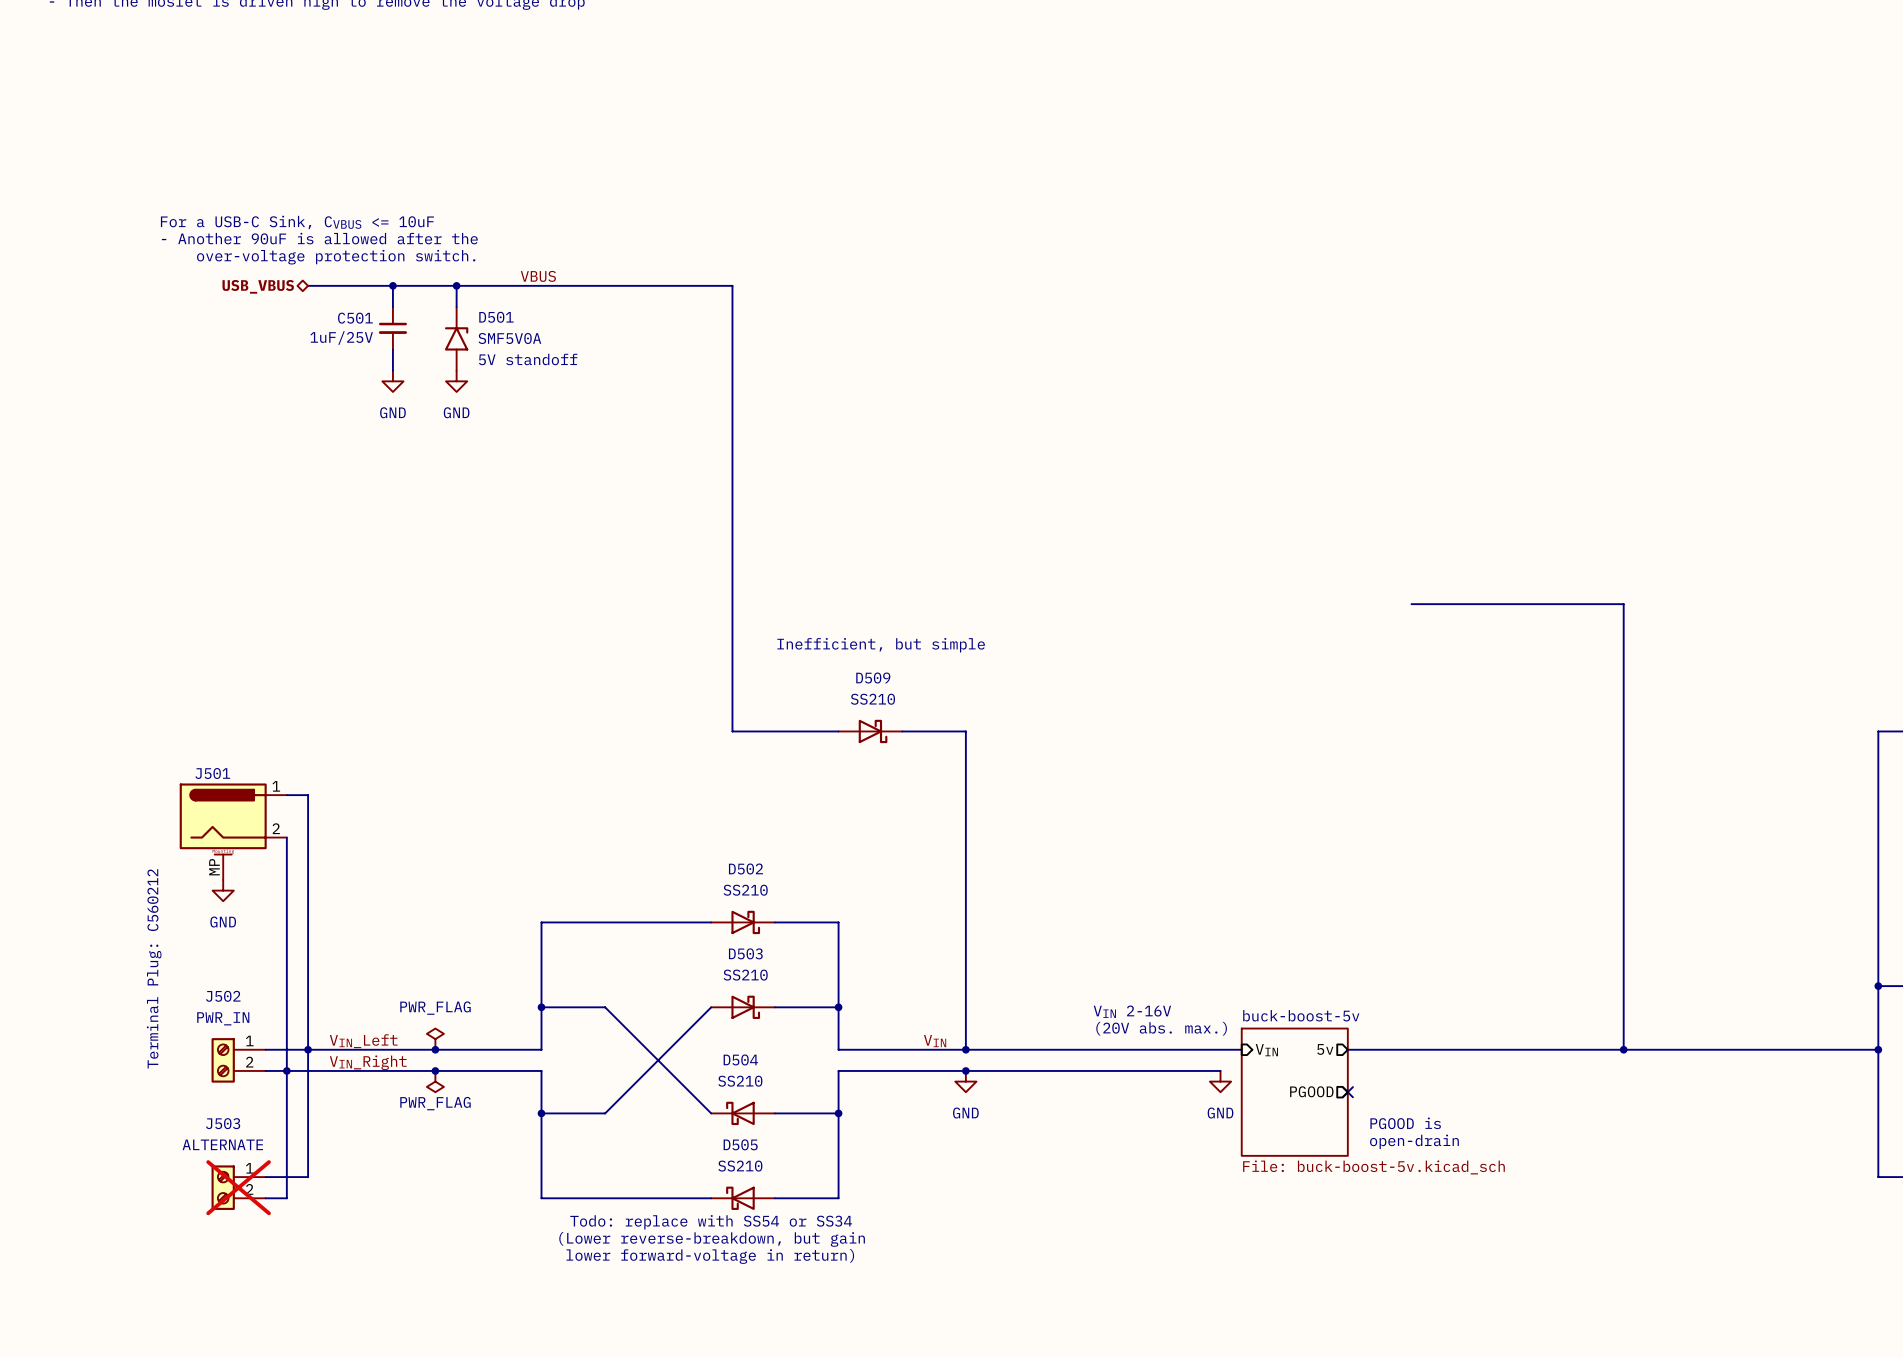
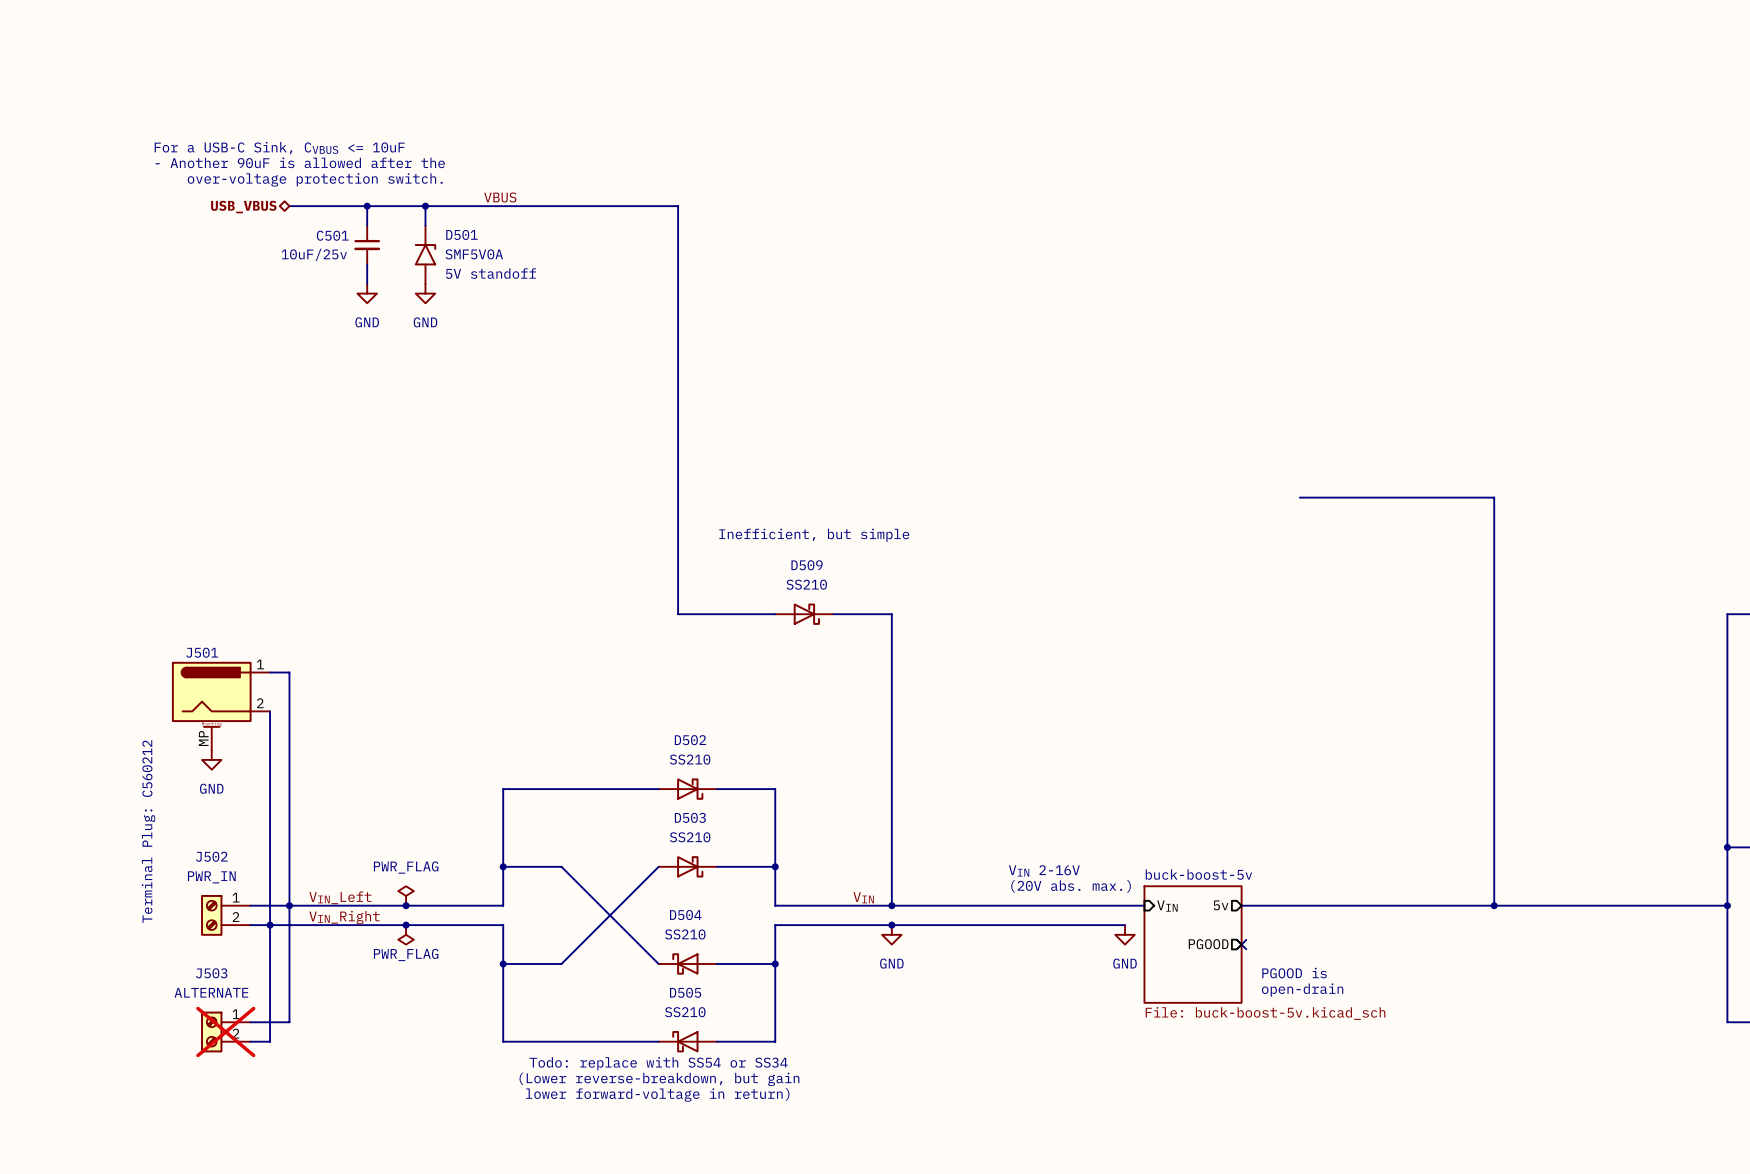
C501 value: 1uF/25V (341, 338) -> 10uF/25v (314, 254)

